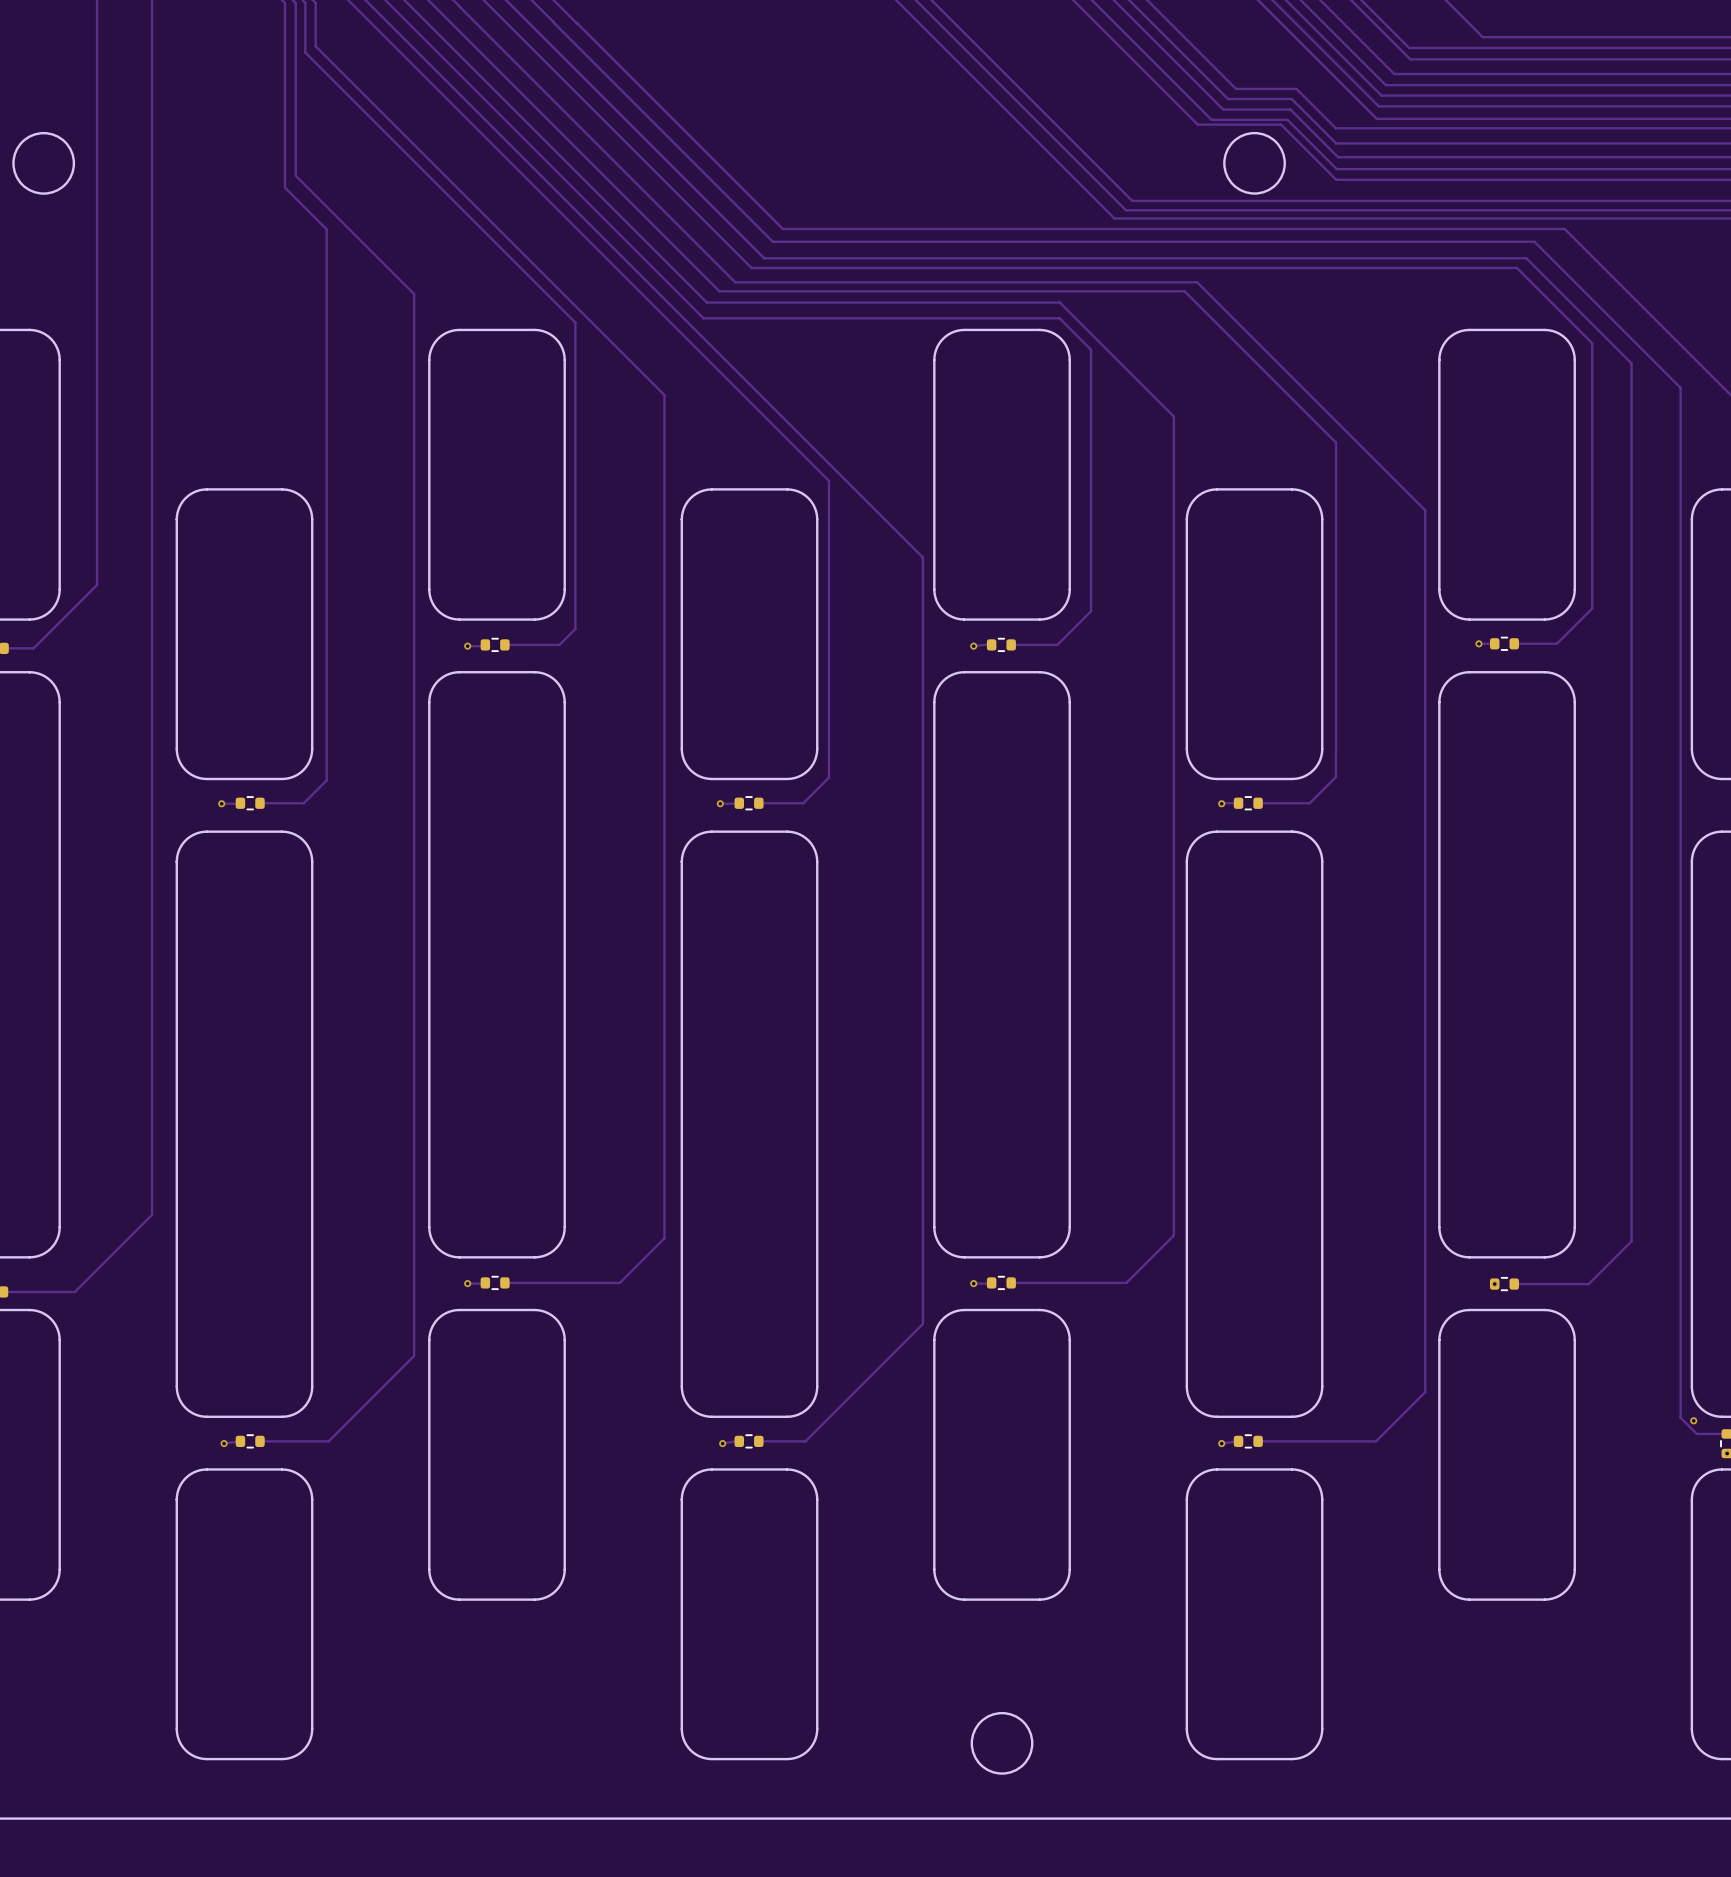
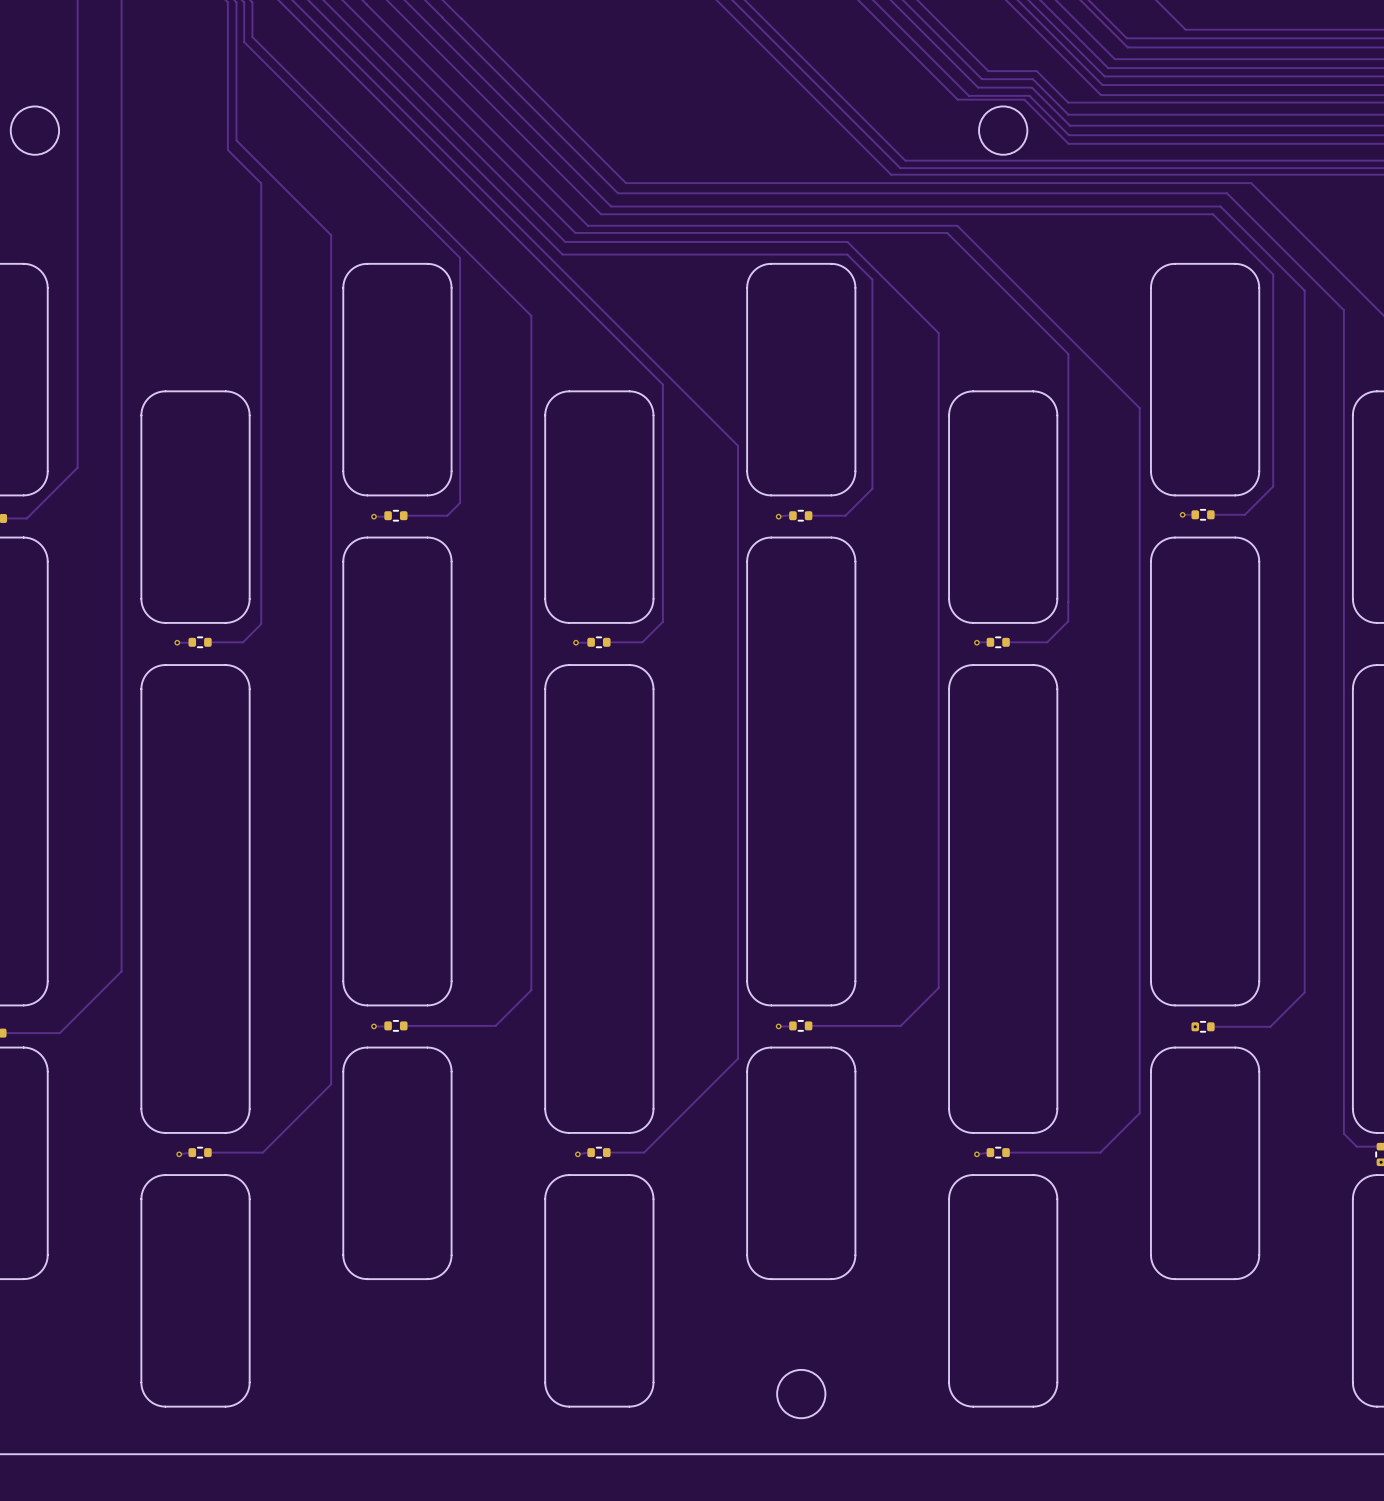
via: (1693, 1420) -> none

